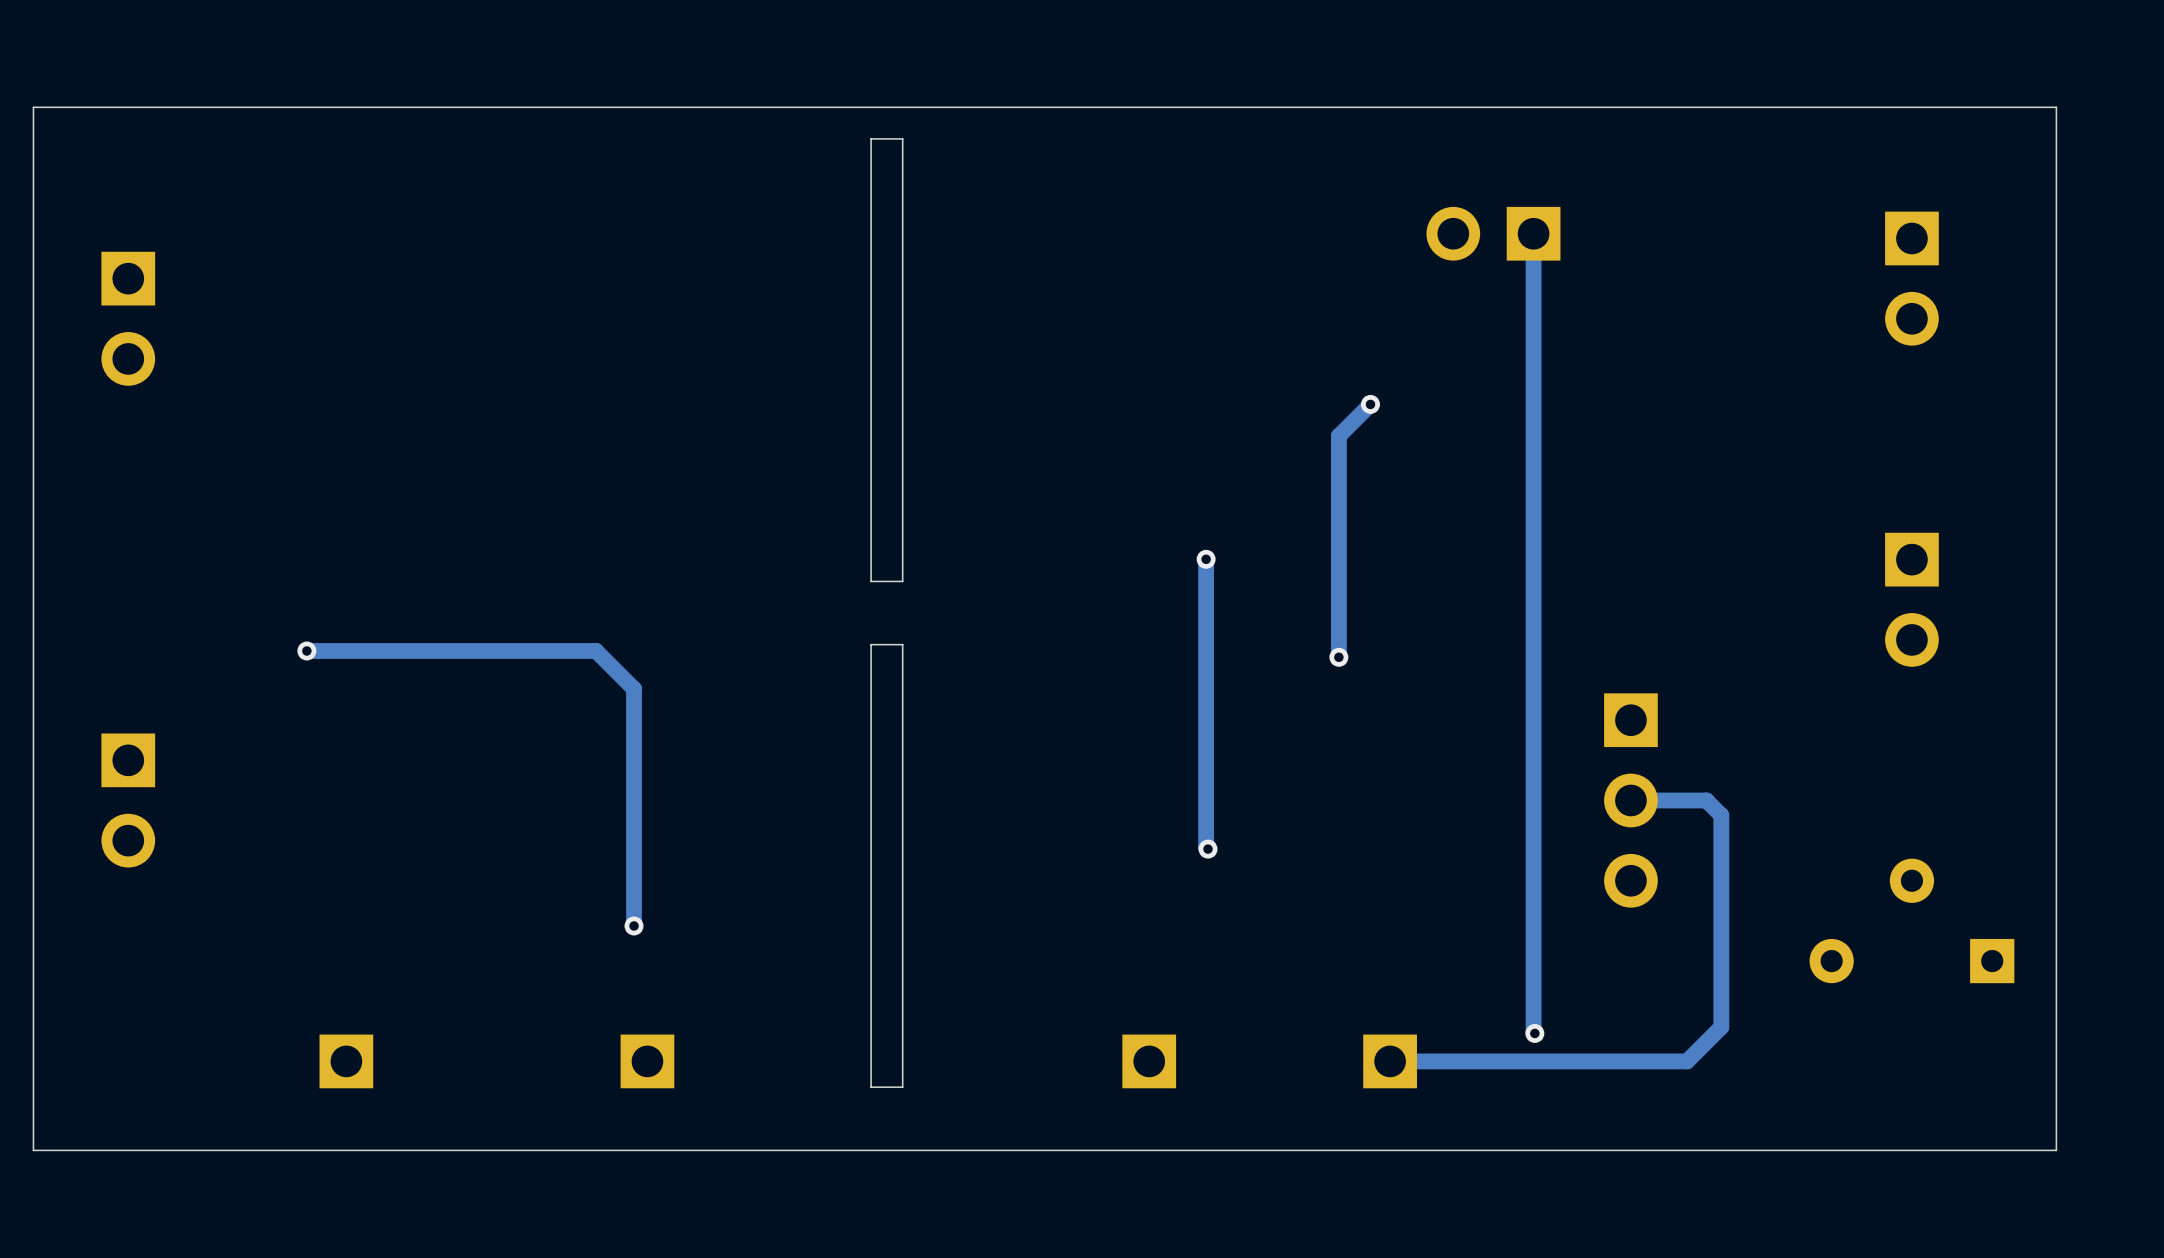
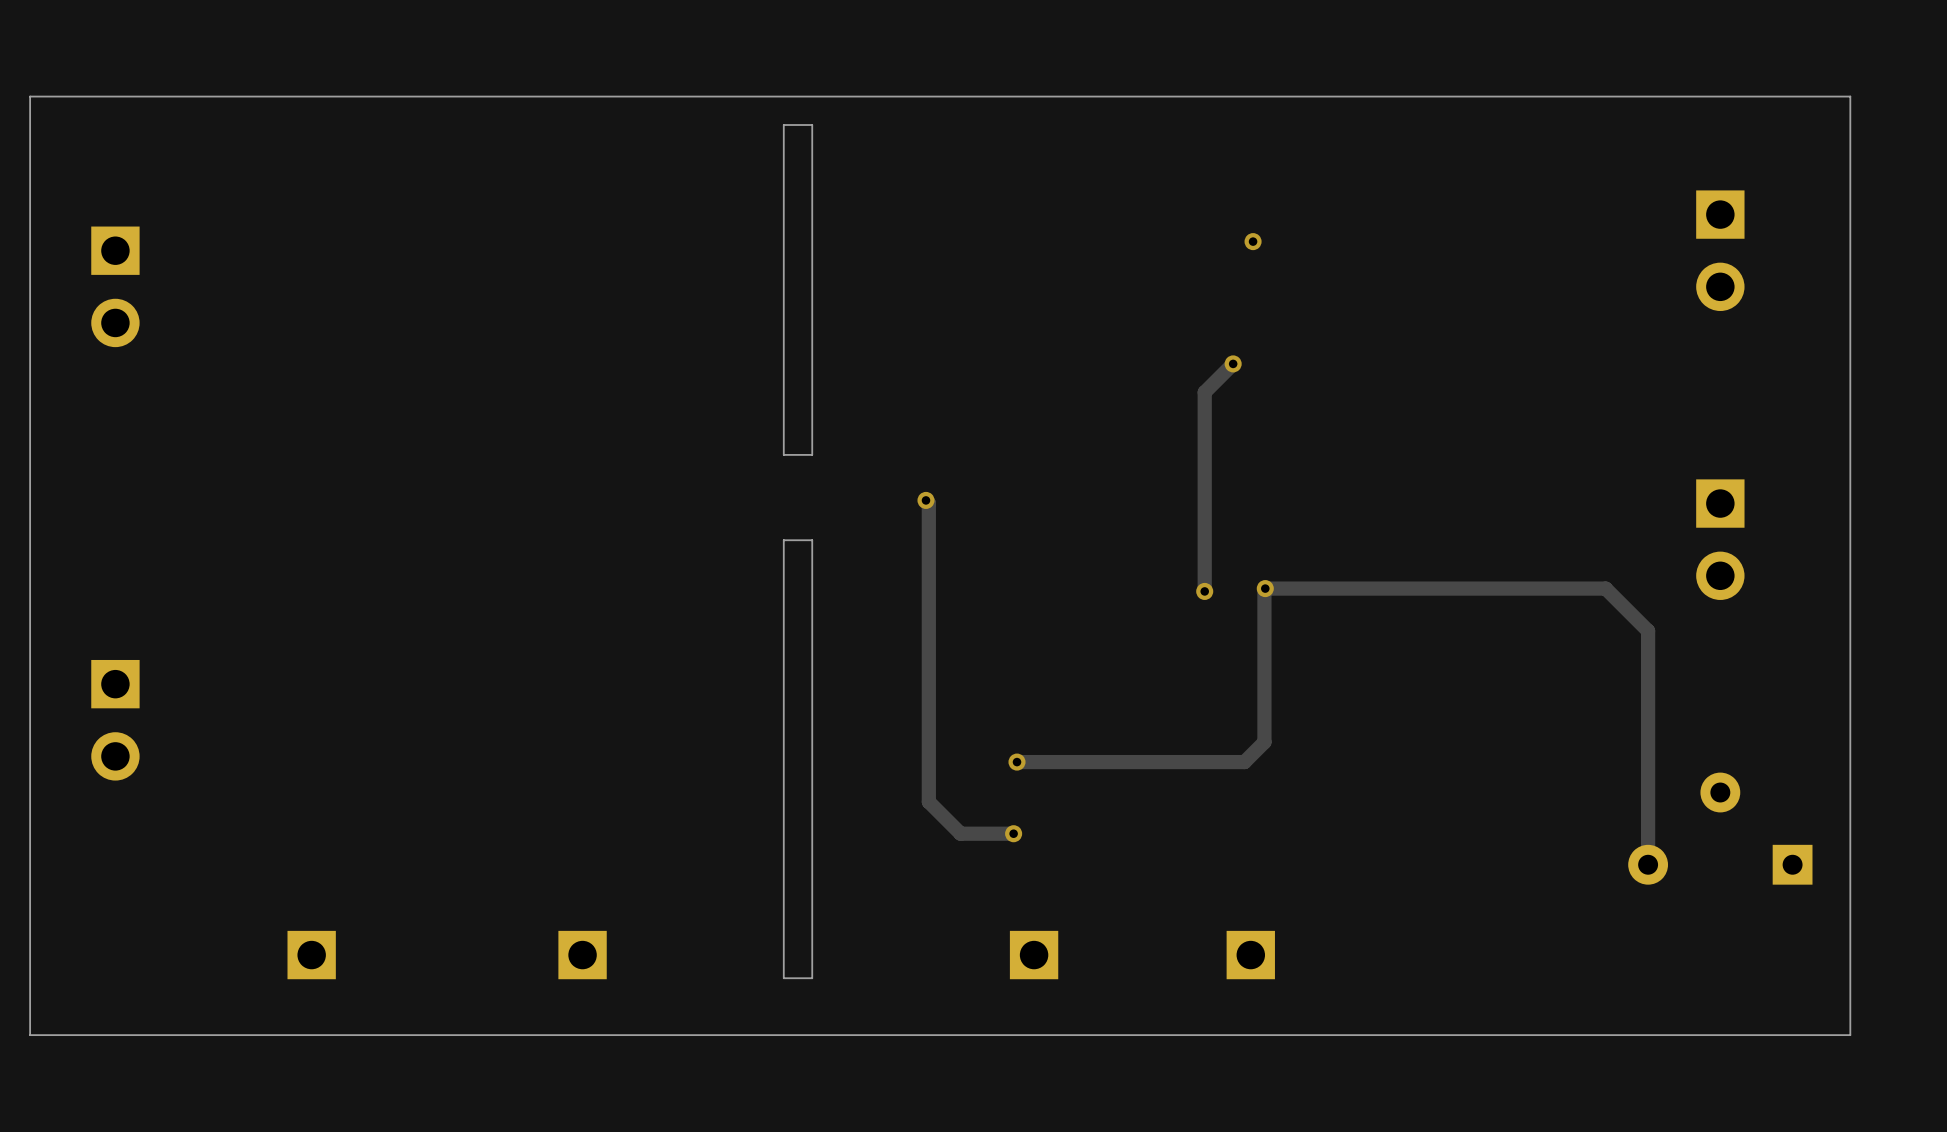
part: (1493, 233) -> none
track: (1533, 233) (1534, 1033) -> none
via: none -> (1253, 241)
board edge: (902, 505) (902, 581) (871, 581) (871, 505) -> (812, 454) (783, 454)
track: none -> (925, 500) (928, 503) (928, 801) (960, 833) (1013, 833)
via: none -> (925, 500)
track: (1206, 559) (1206, 847) (1208, 849) -> none
via: (1206, 559) -> none
board edge: (902, 644) (871, 644) -> (812, 580) (812, 540) (783, 540) (783, 580)
track: (306, 650) (596, 650) (634, 688) (634, 925) -> none
via: (306, 650) -> none
via: none -> (1265, 588)
track: (1630, 800) (1706, 800) (1721, 815) (1721, 1027) (1687, 1061) (1390, 1061) -> none
part: (1630, 800) -> none
track: none -> (1017, 762) (1244, 762) (1264, 742) (1265, 588) (1605, 588) (1648, 630) (1648, 864)
via: none -> (1017, 762)
via: (1208, 849) -> none
via: (634, 925) -> none
via: none -> (1013, 833)
via: (1534, 1033) -> none

